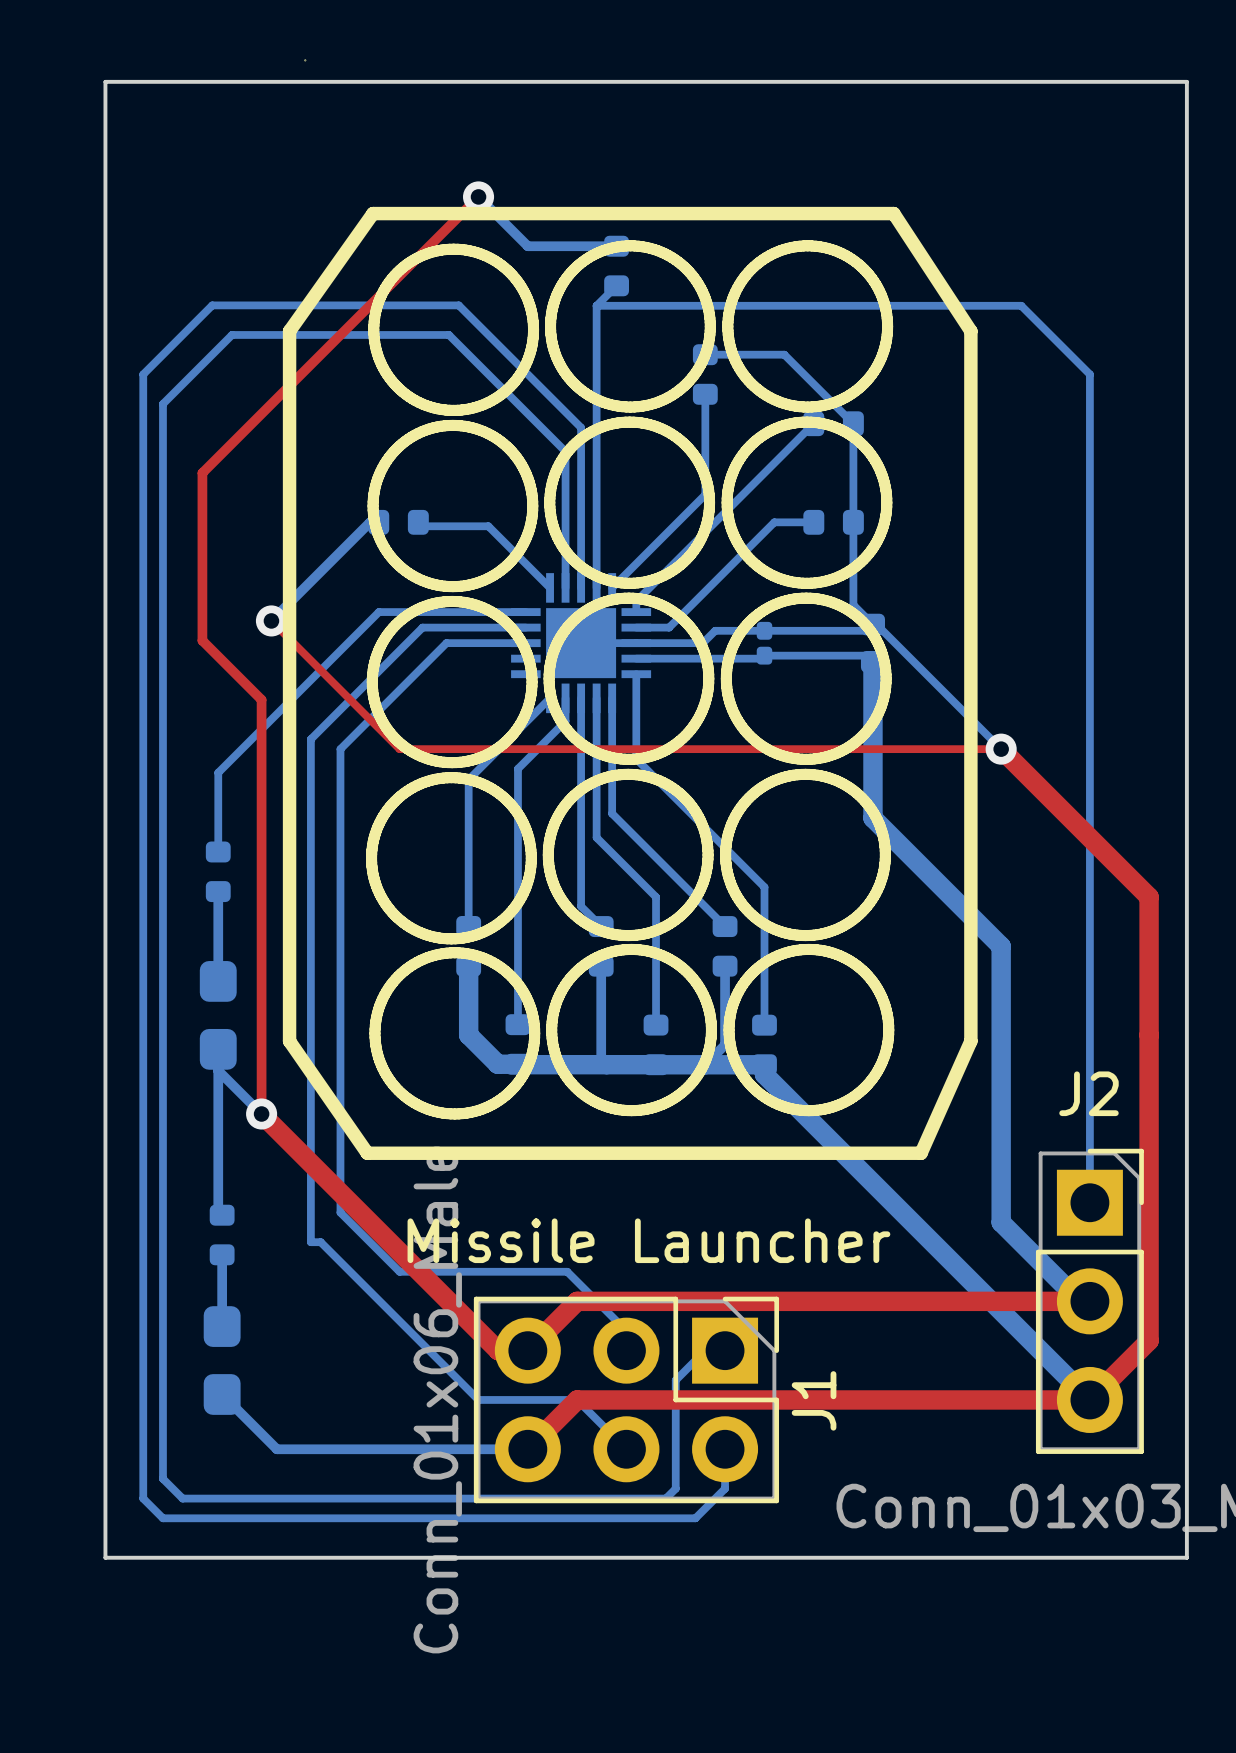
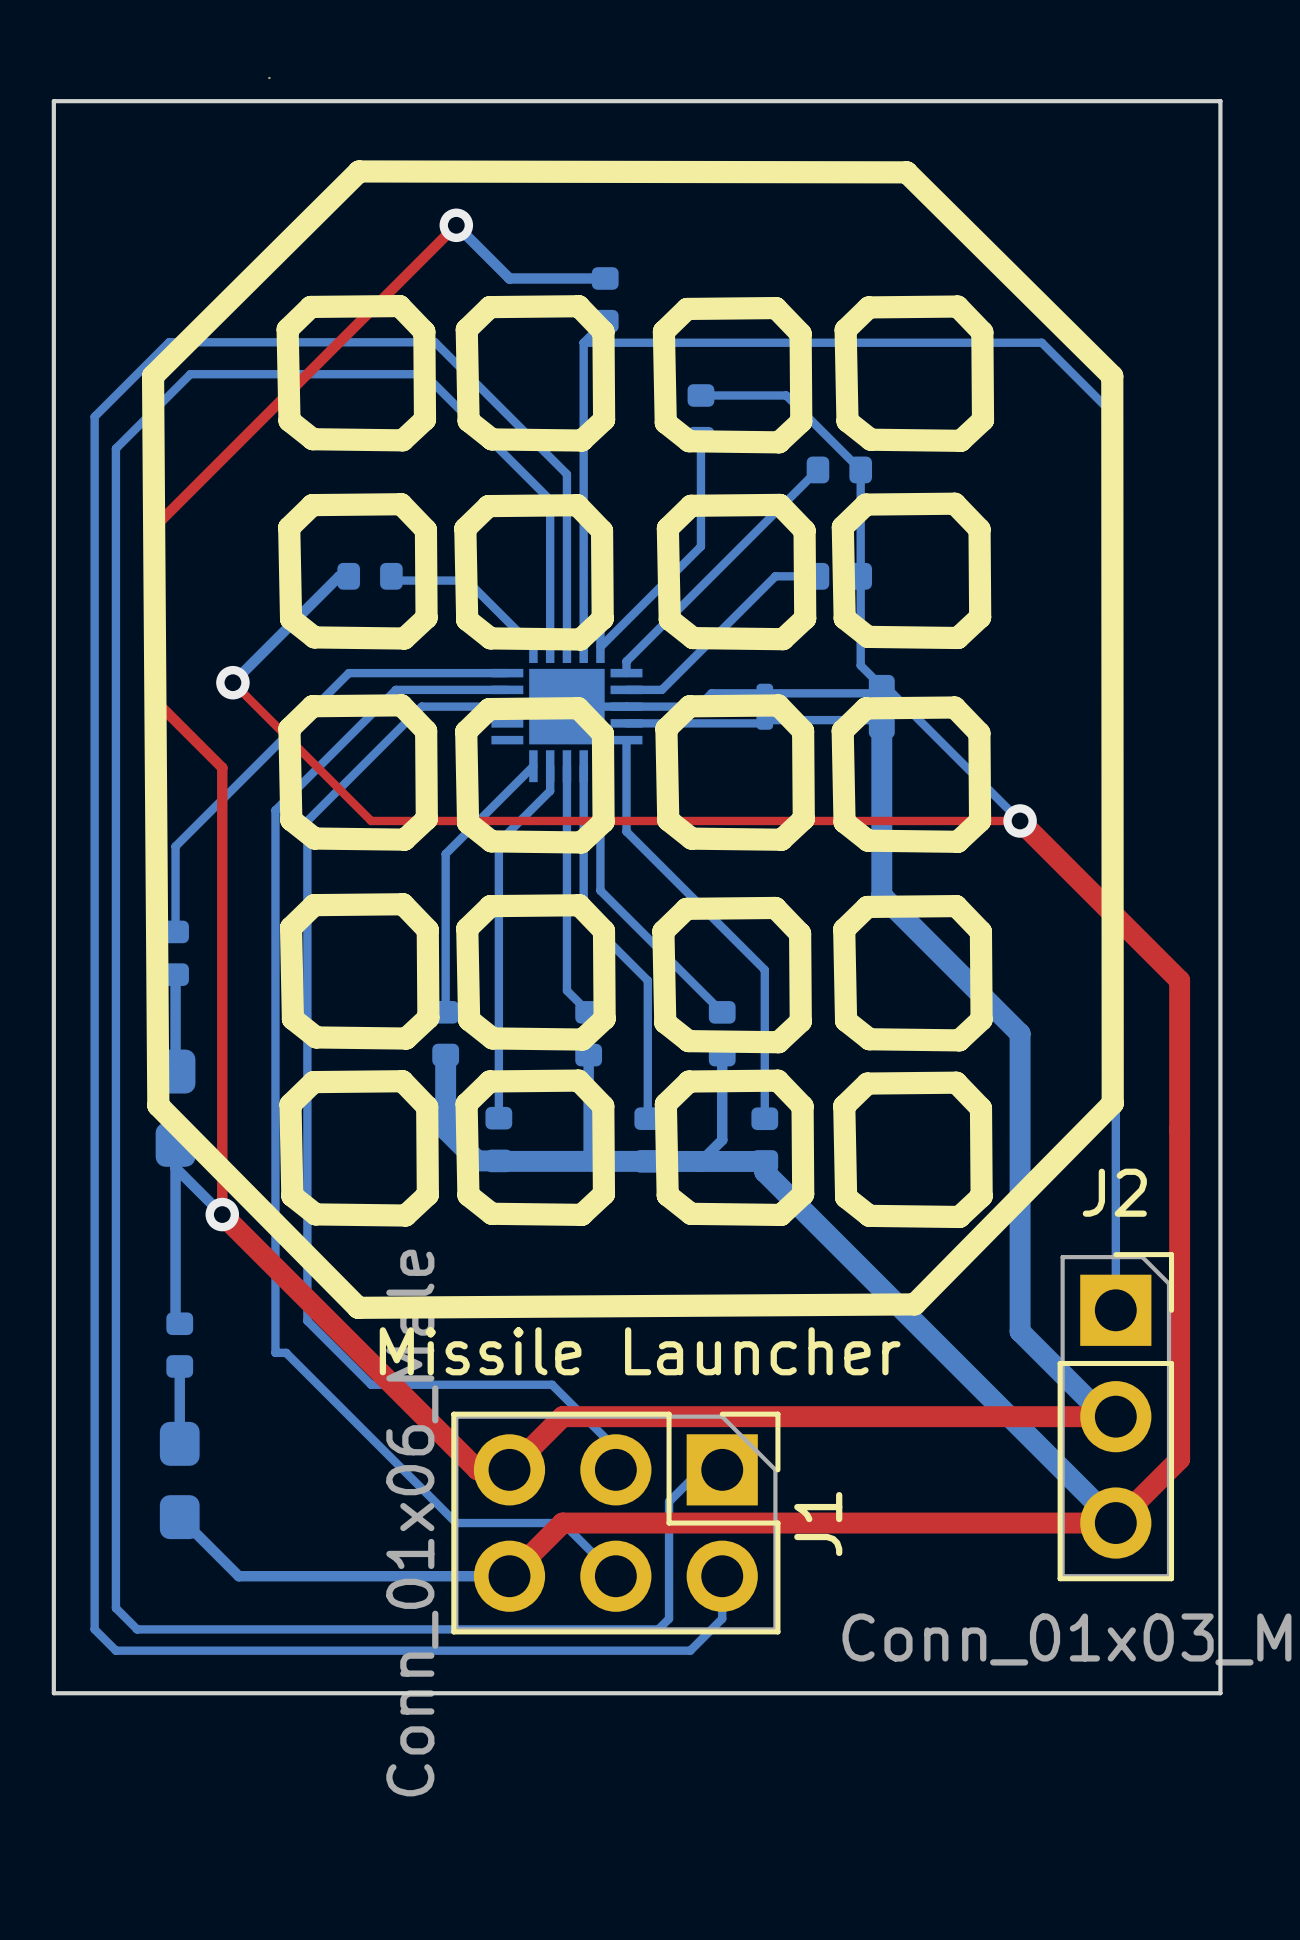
line: (372, 213) (289, 331) (289, 1041) (367, 1153) (921, 1153) (970, 1041) (970, 331) (893, 213) (372, 213) -> (359, 171) (153, 376) (158, 1105) (358, 1307) (914, 1304) (1112, 1103) (1112, 376) (906, 172) (359, 171)
line: (630, 245) (614, 247) (599, 252) (573, 269) (556, 295) (552, 310) (550, 326) (552, 342) (556, 357) (573, 383) (599, 400) (614, 405) (630, 407) (646, 405) (661, 400) (686, 383) (704, 357) (708, 342) (710, 326) (708, 310) (704, 295) (686, 269) (661, 252) (646, 247) (630, 245) -> none
line: (807, 245) (791, 247) (776, 252) (751, 269) (734, 295) (729, 310) (727, 326) (729, 342) (734, 357) (751, 383) (776, 400) (791, 405) (807, 407) (823, 405) (838, 400) (864, 383) (881, 357) (885, 342) (887, 326) (885, 310) (881, 295) (864, 269) (838, 252) (823, 247) (807, 245) -> none
line: (449, 249) (433, 251) (419, 257) (394, 275) (378, 302) (374, 317) (373, 333) (376, 349) (381, 364) (399, 389) (426, 405) (441, 409) (457, 410) (473, 407) (488, 402) (512, 384) (528, 357) (532, 342) (533, 325) (531, 309) (525, 294) (507, 270) (481, 254) (465, 250) (449, 249) -> none
line: none -> (399, 306) (310, 306) (287, 329) (289, 420) (312, 439) (402, 440) (425, 419) (424, 331) (399, 306)
line: none -> (578, 306) (489, 307) (466, 329) (468, 420) (491, 439) (581, 440) (604, 419) (603, 331) (578, 306)
line: none -> (957, 306) (982, 332) (983, 420) (960, 440) (870, 439) (847, 421) (845, 329) (868, 307) (957, 306)
line: none -> (775, 308) (800, 333) (801, 421) (779, 442) (689, 441) (665, 422) (663, 331) (687, 308) (775, 308)
line: (629, 422) (613, 423) (598, 428) (573, 445) (556, 471) (551, 486) (549, 502) (551, 518) (556, 534) (573, 559) (598, 576) (613, 581) (629, 583) (645, 581) (660, 576) (686, 559) (703, 534) (707, 518) (709, 502) (707, 486) (703, 471) (686, 445) (660, 428) (645, 423) (629, 422) -> none
line: (806, 422) (790, 423) (775, 428) (750, 445) (733, 471) (728, 486) (727, 502) (728, 518) (733, 534) (750, 559) (775, 576) (790, 581) (806, 583) (823, 581) (838, 576) (863, 559) (880, 534) (885, 518) (886, 502) (885, 486) (880, 471) (863, 445) (838, 428) (823, 423) (806, 422) -> none
line: (448, 425) (432, 427) (418, 433) (393, 451) (377, 478) (373, 493) (373, 510) (375, 526) (380, 540) (399, 565) (425, 581) (440, 585) (457, 586) (472, 584) (487, 578) (512, 560) (527, 533) (531, 518) (532, 501) (530, 485) (524, 471) (506, 446) (480, 430) (465, 426) (448, 425) -> none
line: none -> (401, 504) (425, 529) (426, 617) (404, 638) (314, 637) (291, 618) (289, 527) (312, 505) (401, 504)
line: none -> (954, 503) (865, 504) (842, 527) (844, 618) (868, 636) (957, 638) (980, 617) (979, 529) (954, 503)
line: none -> (577, 505) (488, 506) (465, 528) (467, 619) (490, 638) (580, 639) (602, 618) (602, 530) (577, 505)
line: none -> (779, 504) (691, 505) (667, 528) (669, 619) (693, 638) (783, 639) (805, 618) (804, 530) (779, 504)
line: (624, 598) (608, 600) (594, 606) (569, 624) (553, 651) (549, 666) (549, 682) (551, 698) (556, 713) (575, 738) (601, 754) (616, 758) (633, 759) (648, 756) (663, 751) (688, 732) (703, 706) (707, 691) (708, 674) (706, 658) (700, 643) (682, 619) (656, 603) (641, 599) (624, 598) -> none
line: (802, 598) (786, 600) (771, 606) (747, 624) (731, 651) (727, 666) (726, 682) (728, 698) (734, 713) (752, 738) (778, 754) (794, 758) (810, 759) (826, 756) (840, 751) (865, 732) (881, 706) (885, 691) (886, 674) (883, 658) (878, 643) (859, 619) (833, 603) (818, 599) (802, 598) -> none
line: (452, 601) (436, 603) (421, 607) (395, 625) (378, 650) (373, 665) (372, 682) (373, 698) (378, 713) (395, 739) (421, 756) (436, 761) (452, 762) (468, 761) (483, 756) (508, 739) (525, 713) (530, 698) (532, 682) (530, 665) (525, 650) (508, 625) (483, 607) (468, 603) (452, 601) -> none
line: none -> (401, 705) (312, 706) (289, 728) (291, 820) (314, 838) (404, 839) (426, 818) (426, 730) (401, 705)
line: none -> (778, 705) (689, 706) (666, 728) (668, 820) (691, 838) (781, 839) (803, 819) (803, 731) (778, 705)
line: none -> (954, 707) (979, 733) (980, 821) (957, 841) (867, 840) (844, 822) (842, 730) (865, 708) (954, 707)
line: none -> (578, 708) (602, 733) (603, 821) (581, 842) (491, 841) (468, 822) (466, 731) (489, 709) (578, 708)
line: (624, 774) (608, 776) (593, 782) (569, 800) (553, 827) (549, 842) (548, 859) (550, 875) (556, 889) (574, 914) (600, 930) (616, 934) (632, 935) (648, 933) (662, 927) (687, 909) (703, 882) (707, 867) (707, 850) (705, 834) (700, 820) (681, 795) (655, 779) (640, 775) (624, 774) -> none
line: (801, 774) (785, 776) (770, 782) (746, 800) (730, 827) (726, 842) (725, 859) (728, 875) (733, 889) (751, 914) (778, 930) (793, 934) (809, 935) (825, 933) (840, 927) (864, 909) (880, 882) (884, 867) (885, 850) (882, 834) (877, 820) (859, 795) (832, 779) (817, 775) (801, 774) -> none
line: (451, 777) (435, 779) (420, 784) (394, 801) (377, 826) (373, 842) (371, 858) (373, 874) (377, 889) (394, 915) (420, 932) (435, 937) (451, 938) (467, 937) (482, 932) (507, 915) (525, 889) (529, 874) (531, 858) (529, 842) (525, 826) (507, 801) (482, 784) (467, 779) (451, 777) -> none
line: none -> (403, 904) (427, 929) (428, 1017) (406, 1038) (316, 1037) (292, 1018) (291, 927) (314, 905) (403, 904)
line: none -> (579, 905) (604, 930) (604, 1018) (582, 1039) (492, 1038) (469, 1019) (467, 928) (490, 906) (579, 905)
line: none -> (956, 906) (867, 906) (844, 929) (846, 1020) (869, 1039) (959, 1040) (981, 1019) (980, 931) (956, 906)
line: none -> (775, 907) (800, 933) (800, 1021) (778, 1042) (688, 1041) (665, 1022) (663, 931) (686, 908) (775, 907)
line: (627, 949) (611, 951) (596, 957) (572, 975) (556, 1002) (552, 1017) (551, 1034) (554, 1050) (559, 1065) (577, 1089) (604, 1105) (619, 1109) (635, 1110) (651, 1108) (666, 1102) (690, 1084) (706, 1057) (710, 1042) (711, 1025) (708, 1009) (703, 995) (685, 970) (659, 954) (643, 950) (627, 949) -> none
line: (804, 949) (788, 951) (774, 957) (749, 975) (733, 1002) (729, 1017) (729, 1034) (731, 1050) (736, 1065) (755, 1089) (781, 1105) (796, 1109) (813, 1110) (828, 1108) (843, 1102) (868, 1084) (883, 1057) (887, 1042) (888, 1025) (886, 1009) (880, 995) (862, 970) (836, 954) (821, 950) (804, 949) -> none
line: (454, 952) (438, 954) (423, 959) (398, 976) (381, 1002) (376, 1017) (374, 1033) (376, 1049) (381, 1064) (398, 1090) (423, 1107) (438, 1112) (454, 1114) (470, 1112) (485, 1107) (511, 1090) (528, 1064) (533, 1049) (534, 1033) (533, 1017) (528, 1002) (511, 976) (485, 959) (470, 954) (454, 952) -> none
line: none -> (578, 1080) (489, 1081) (466, 1103) (468, 1195) (491, 1213) (581, 1214) (603, 1194) (603, 1106) (578, 1080)
line: none -> (777, 1080) (688, 1081) (665, 1104) (667, 1195) (691, 1213) (781, 1214) (803, 1194) (802, 1106) (777, 1080)
line: none -> (402, 1081) (427, 1106) (427, 1194) (405, 1215) (315, 1214) (292, 1195) (290, 1104) (313, 1082) (402, 1081)
line: none -> (956, 1082) (980, 1108) (981, 1196) (959, 1216) (869, 1215) (846, 1197) (844, 1106) (867, 1083) (956, 1082)

